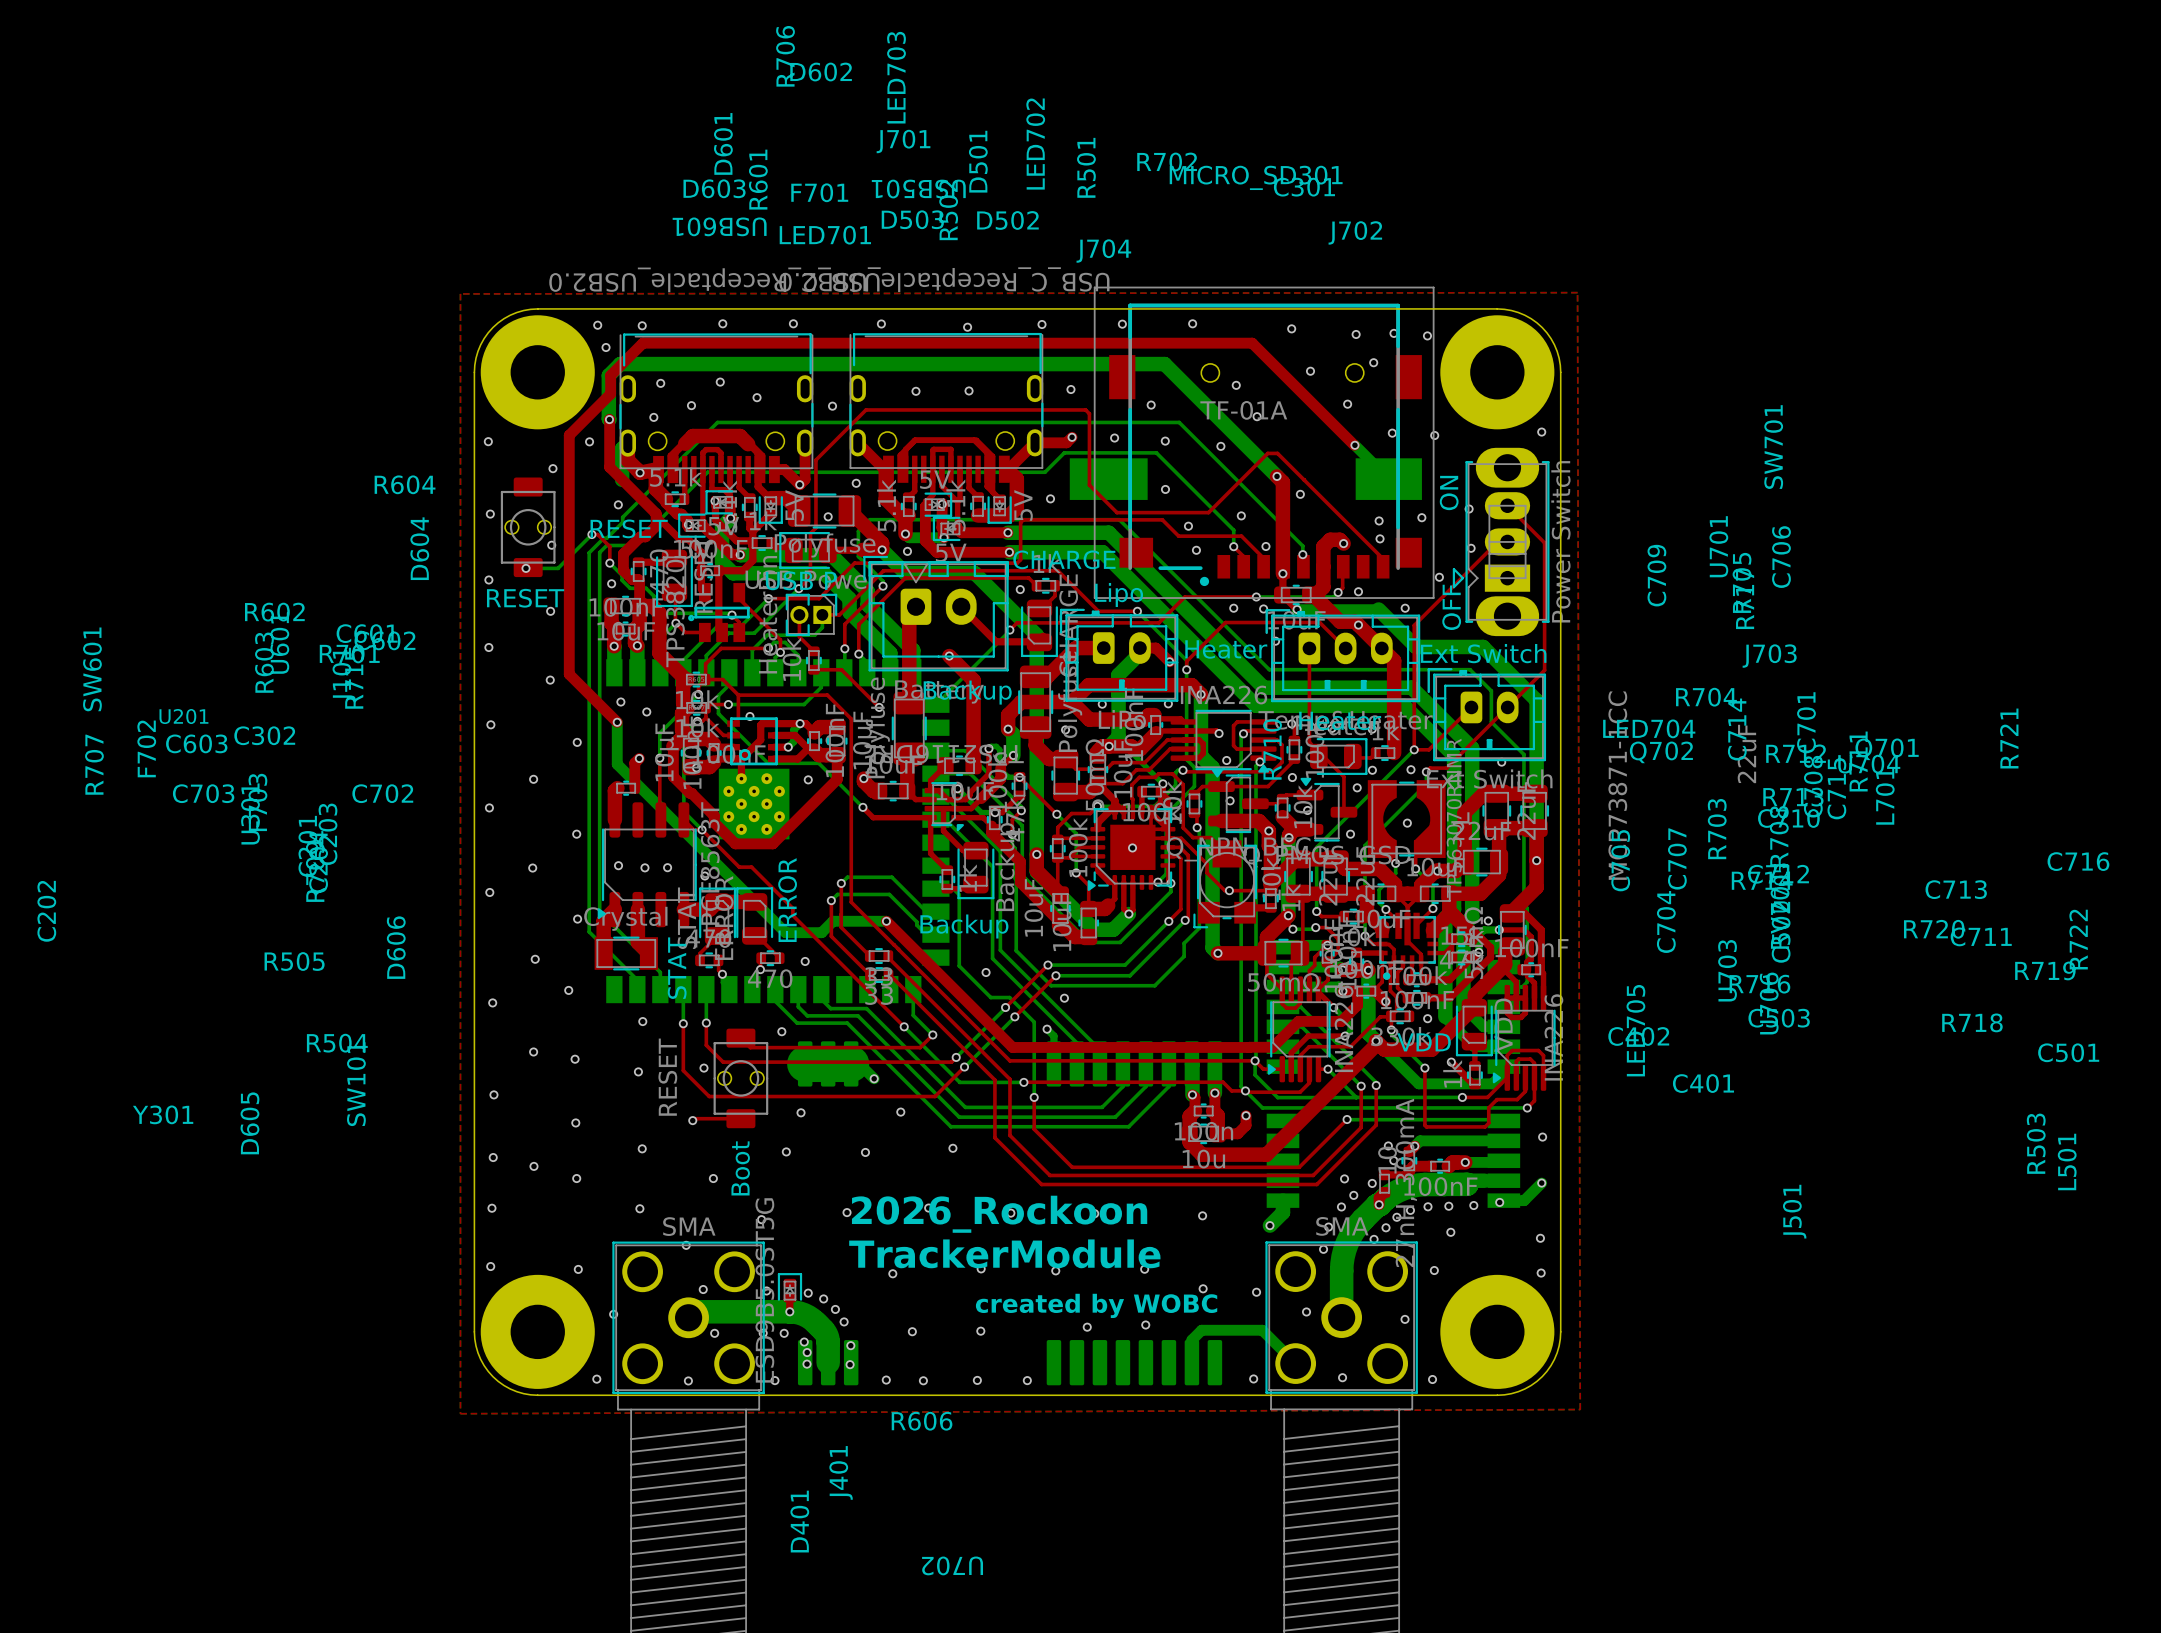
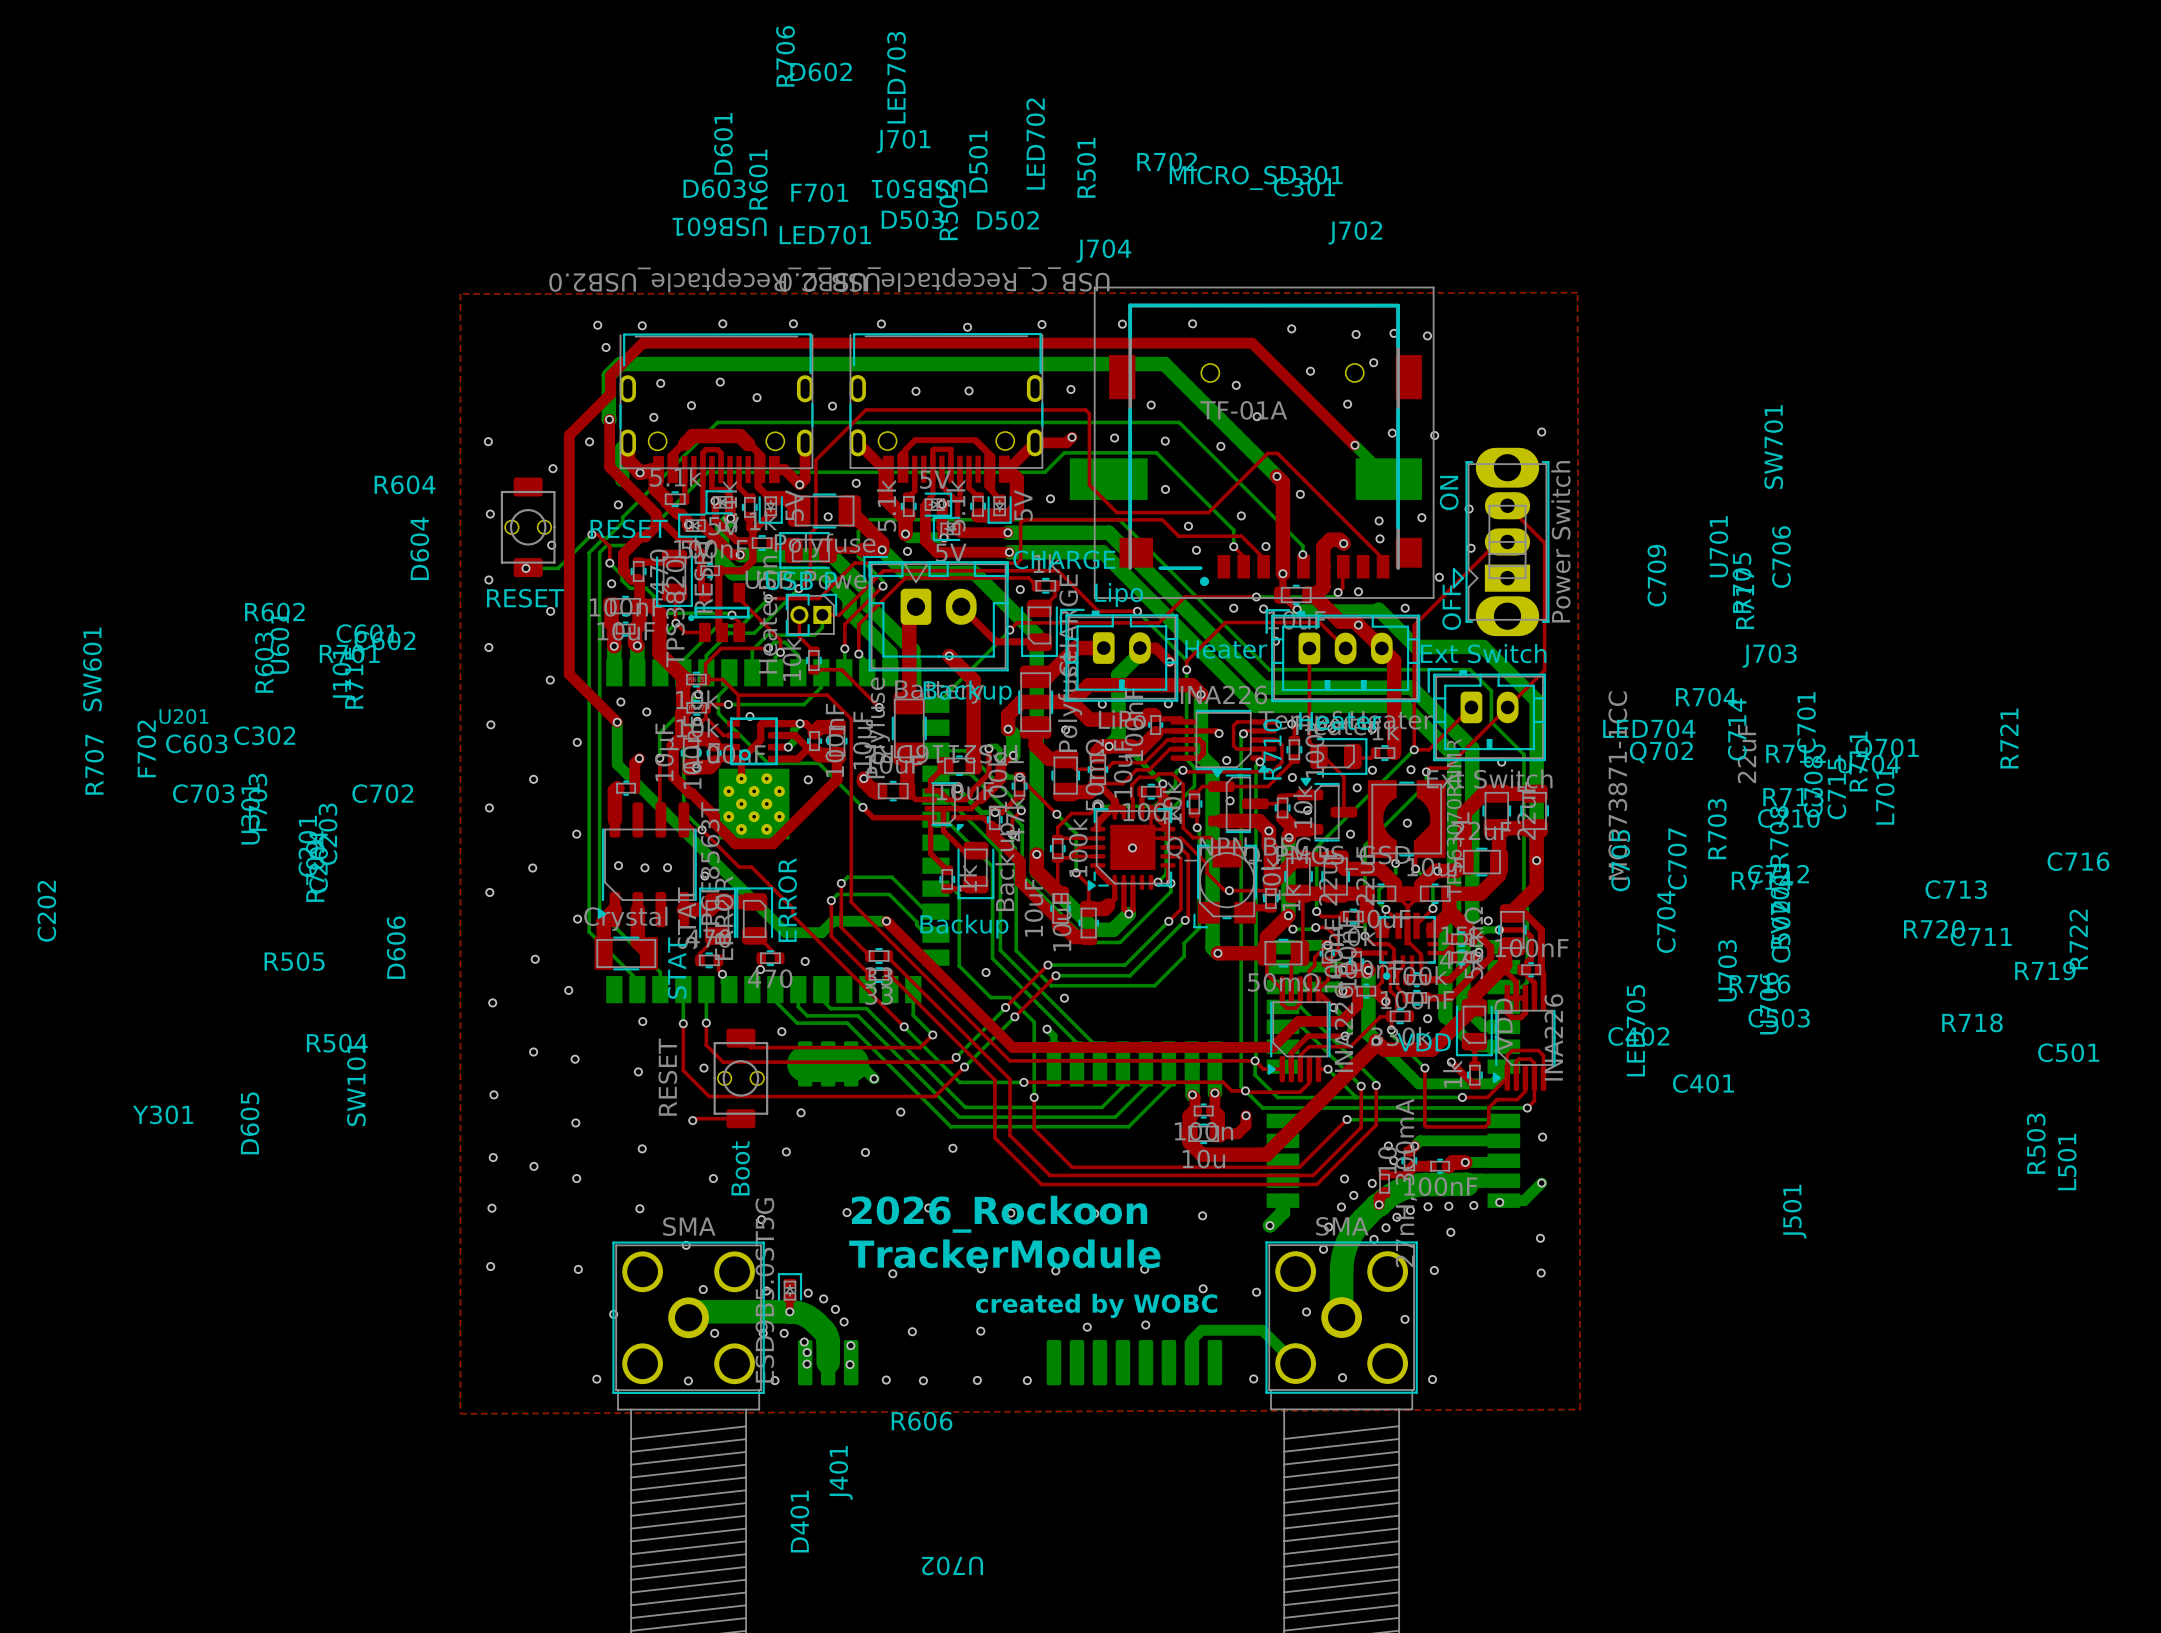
part: (1017, 852) -> none

